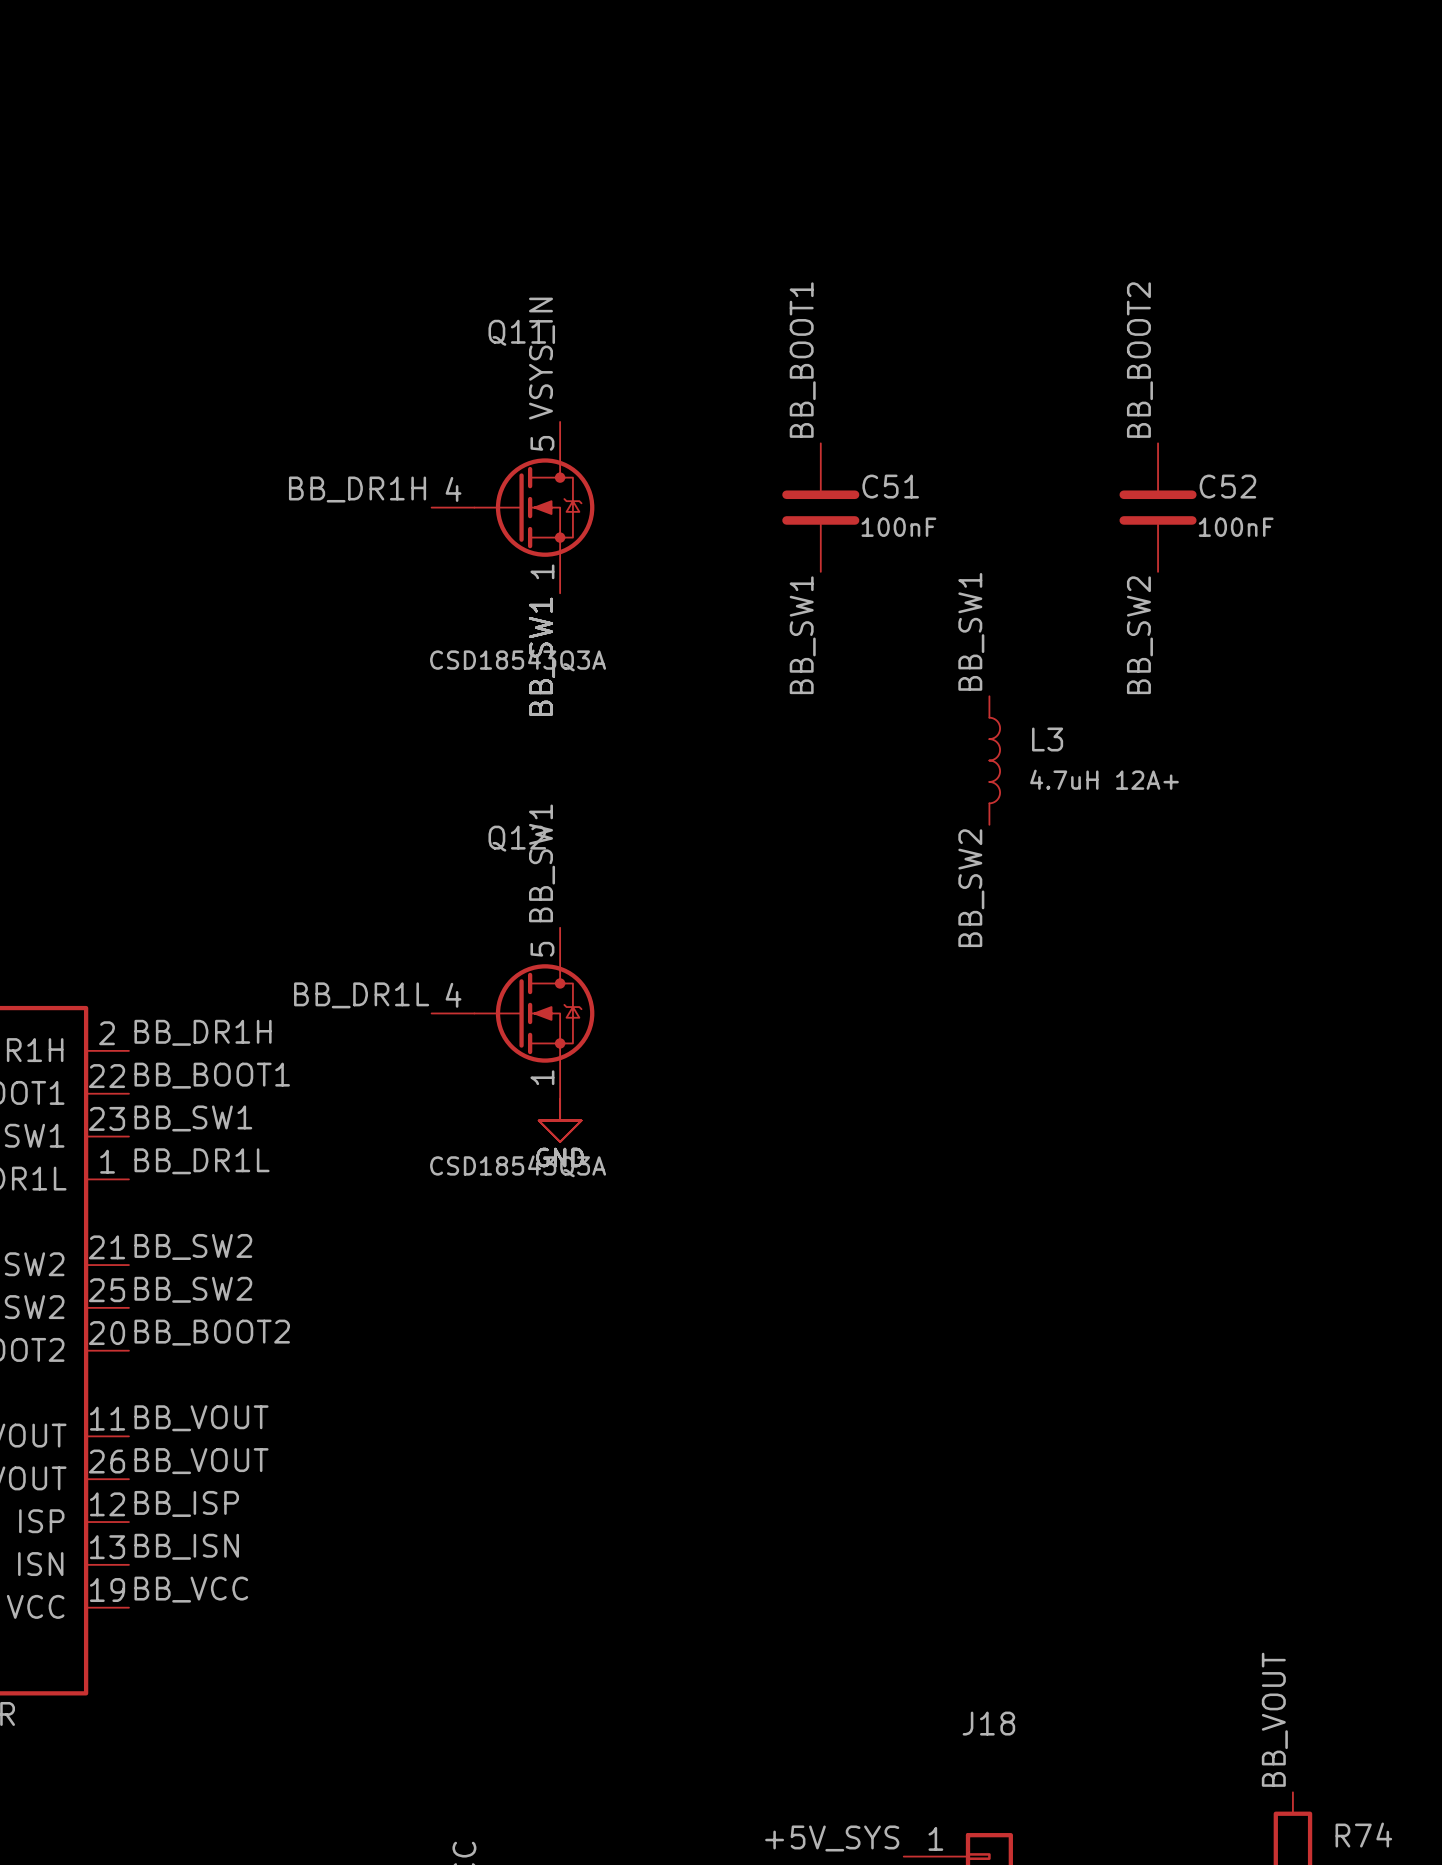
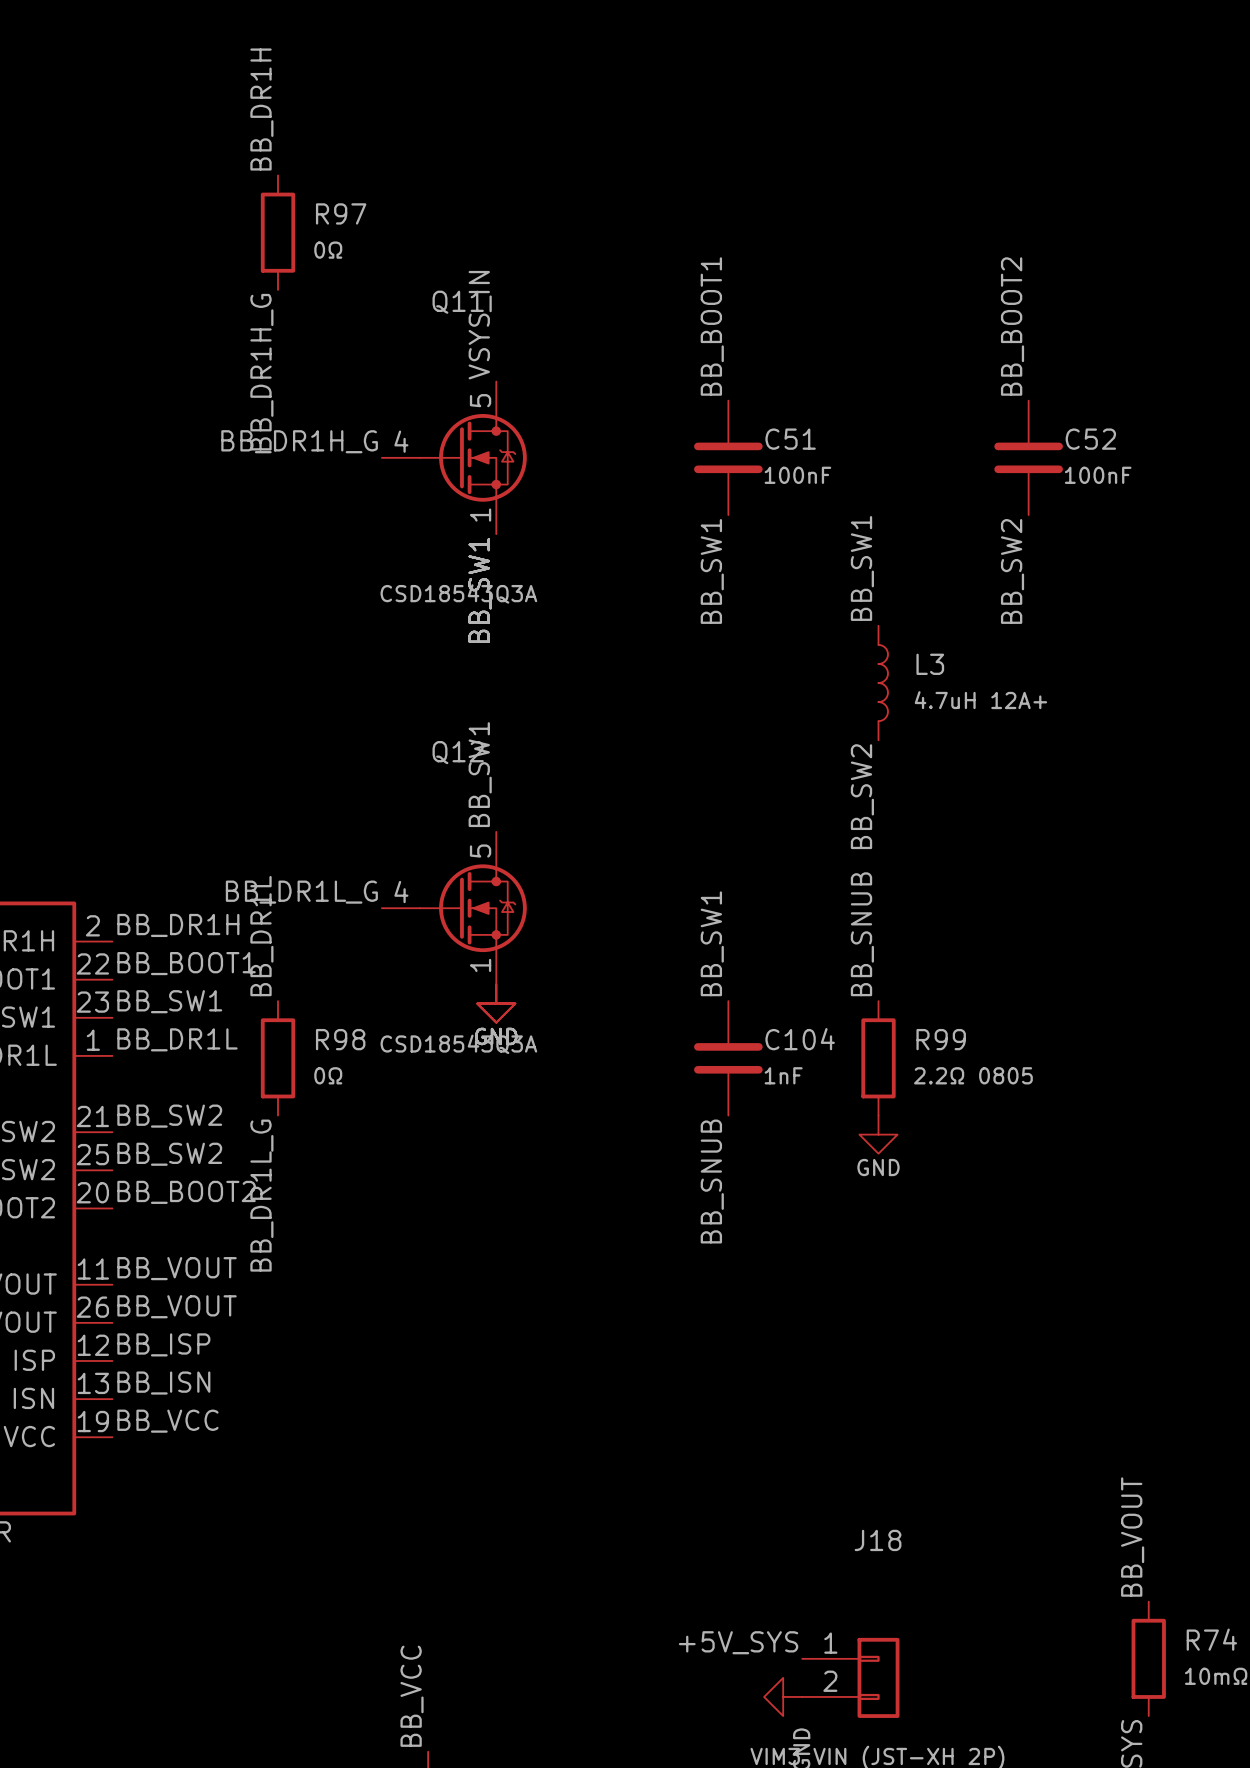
label: none -> BB_DR1H (261, 109)
R97: none -> 0Ω (278, 232)
label: none -> BB_DR1H_G (261, 372)
label: BB_DR1H (357, 489) -> BB_DR1H_G (299, 441)
label: BB_DR1L (361, 995) -> BB_DR1L_G (301, 892)
label: none -> BB_SNUB (862, 934)
label: none -> BB_DR1L (261, 936)
label: none -> BB_SW1 (712, 943)
R98: none -> 0Ω (278, 1058)
C104: none -> 1nF (728, 1058)
R99: none -> 2.2Ω 0805 (878, 1058)
power symbol: none -> GND (878, 1134)
label: none -> BB_SNUB (712, 1181)
label: none -> BB_DR1L_G (261, 1195)

